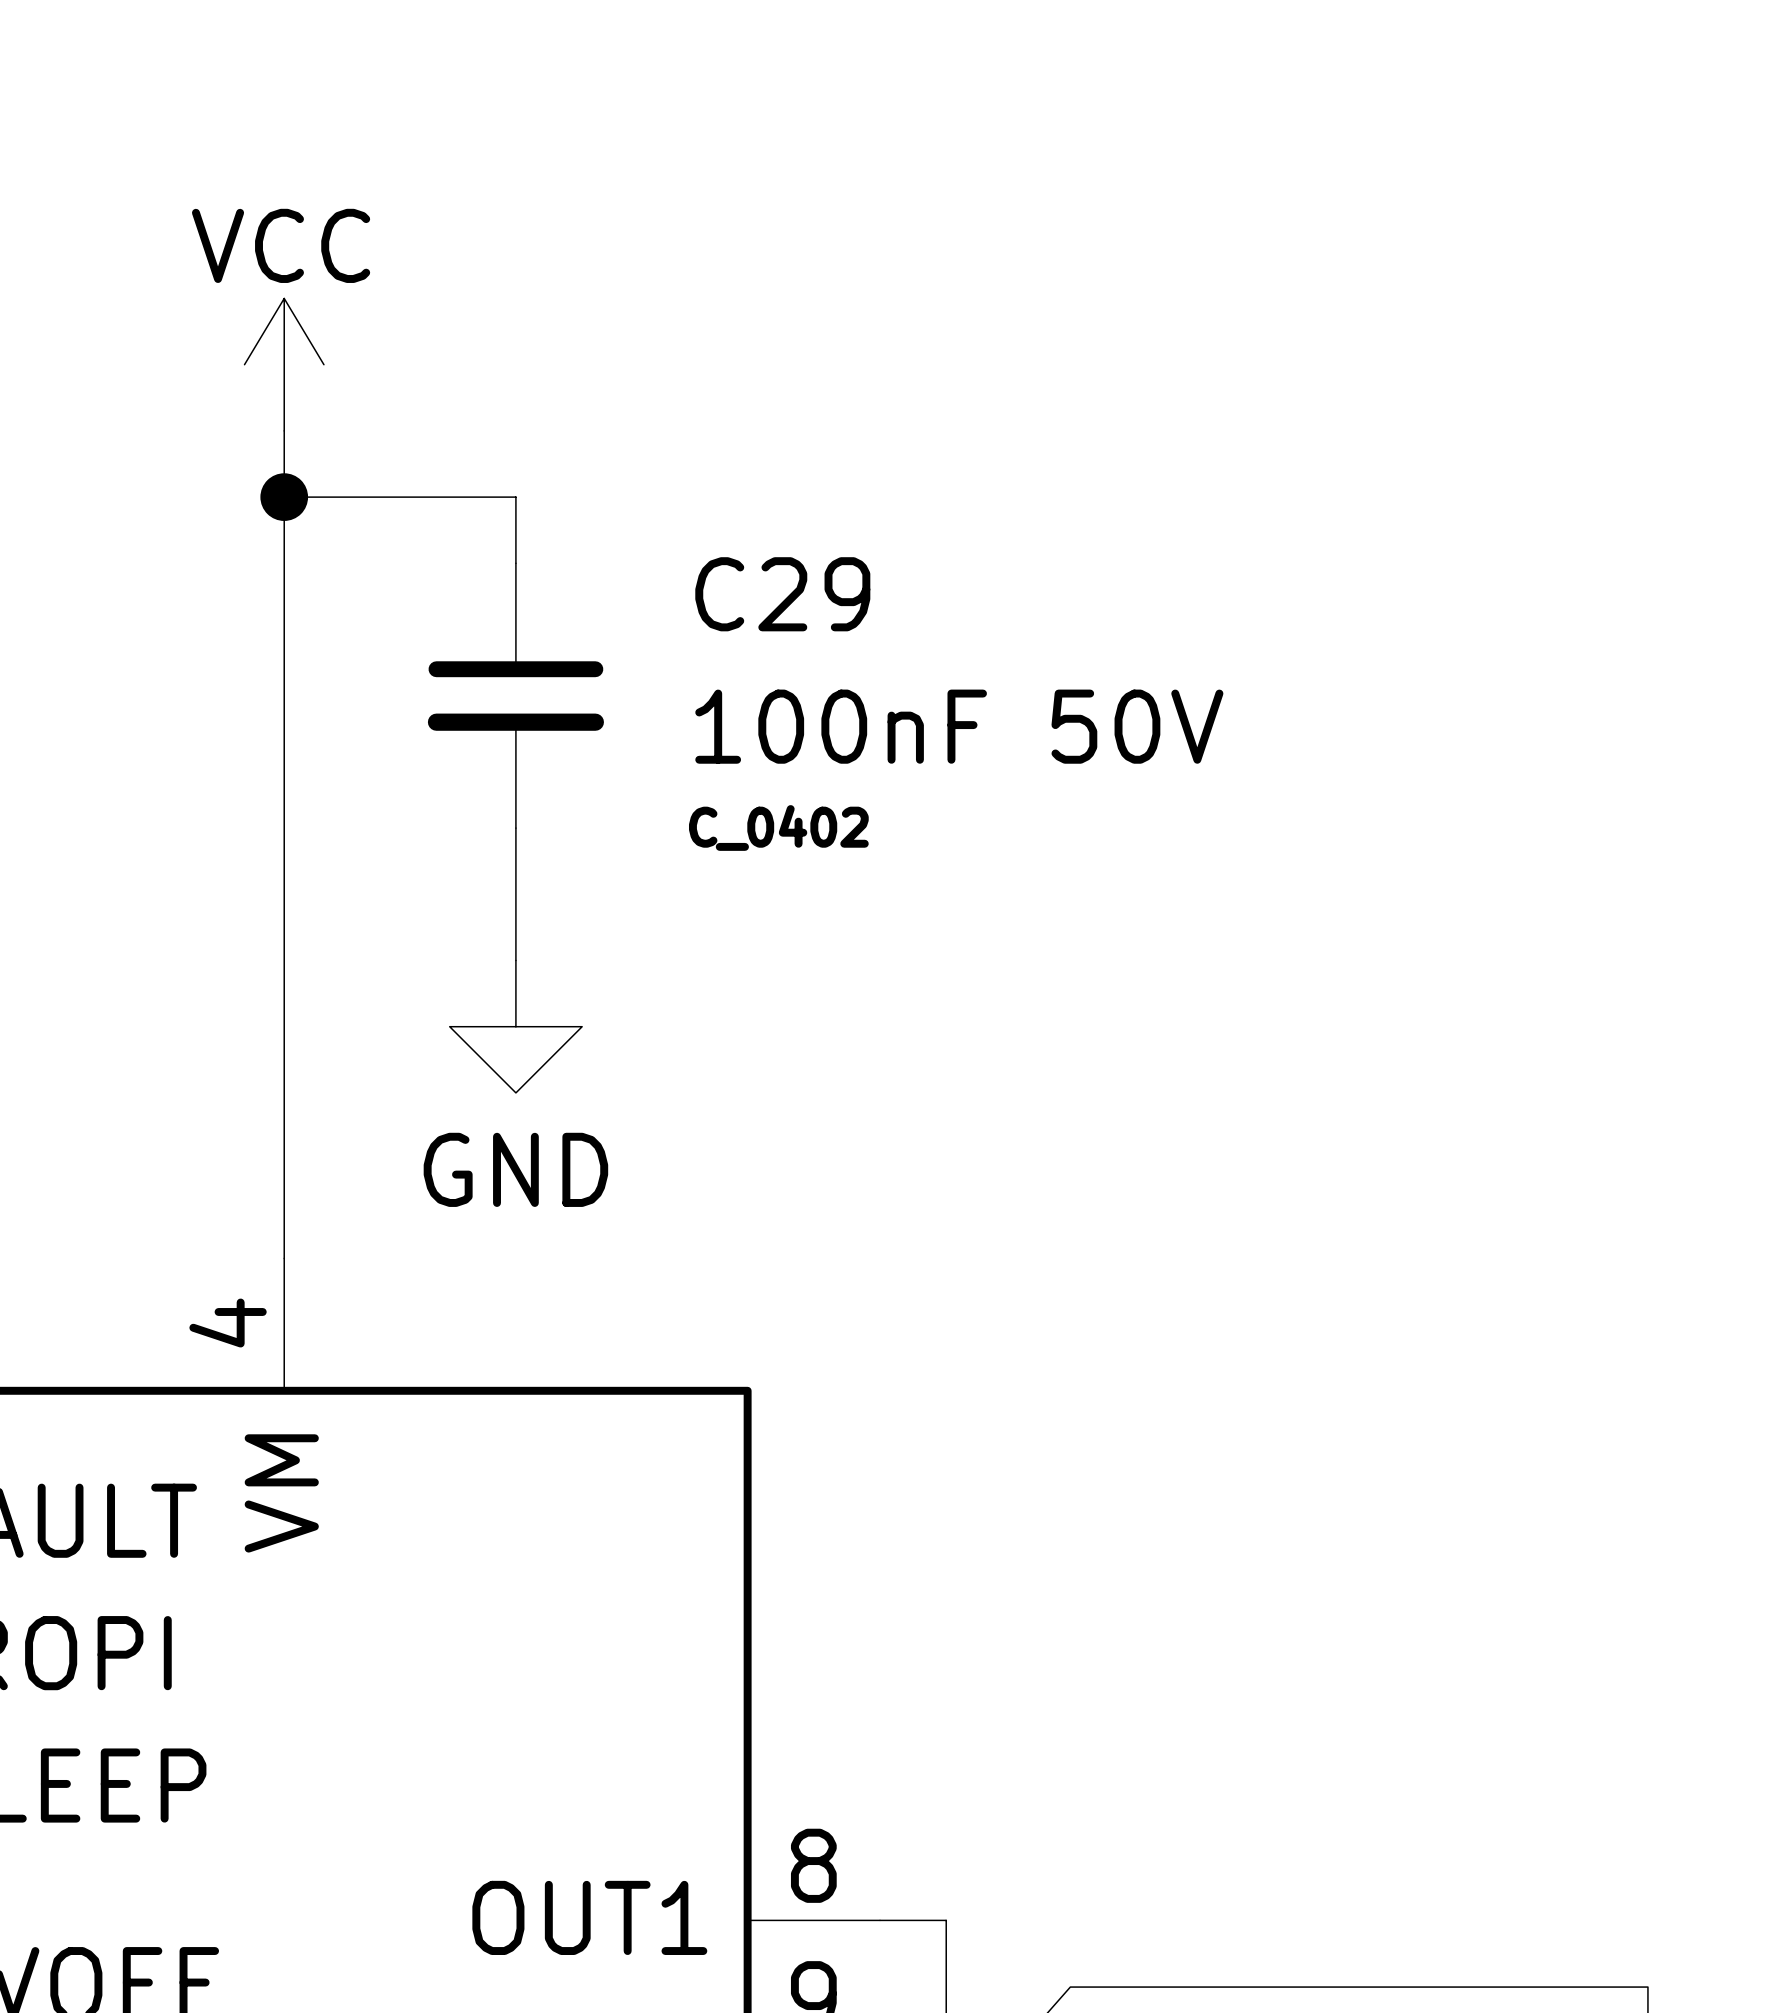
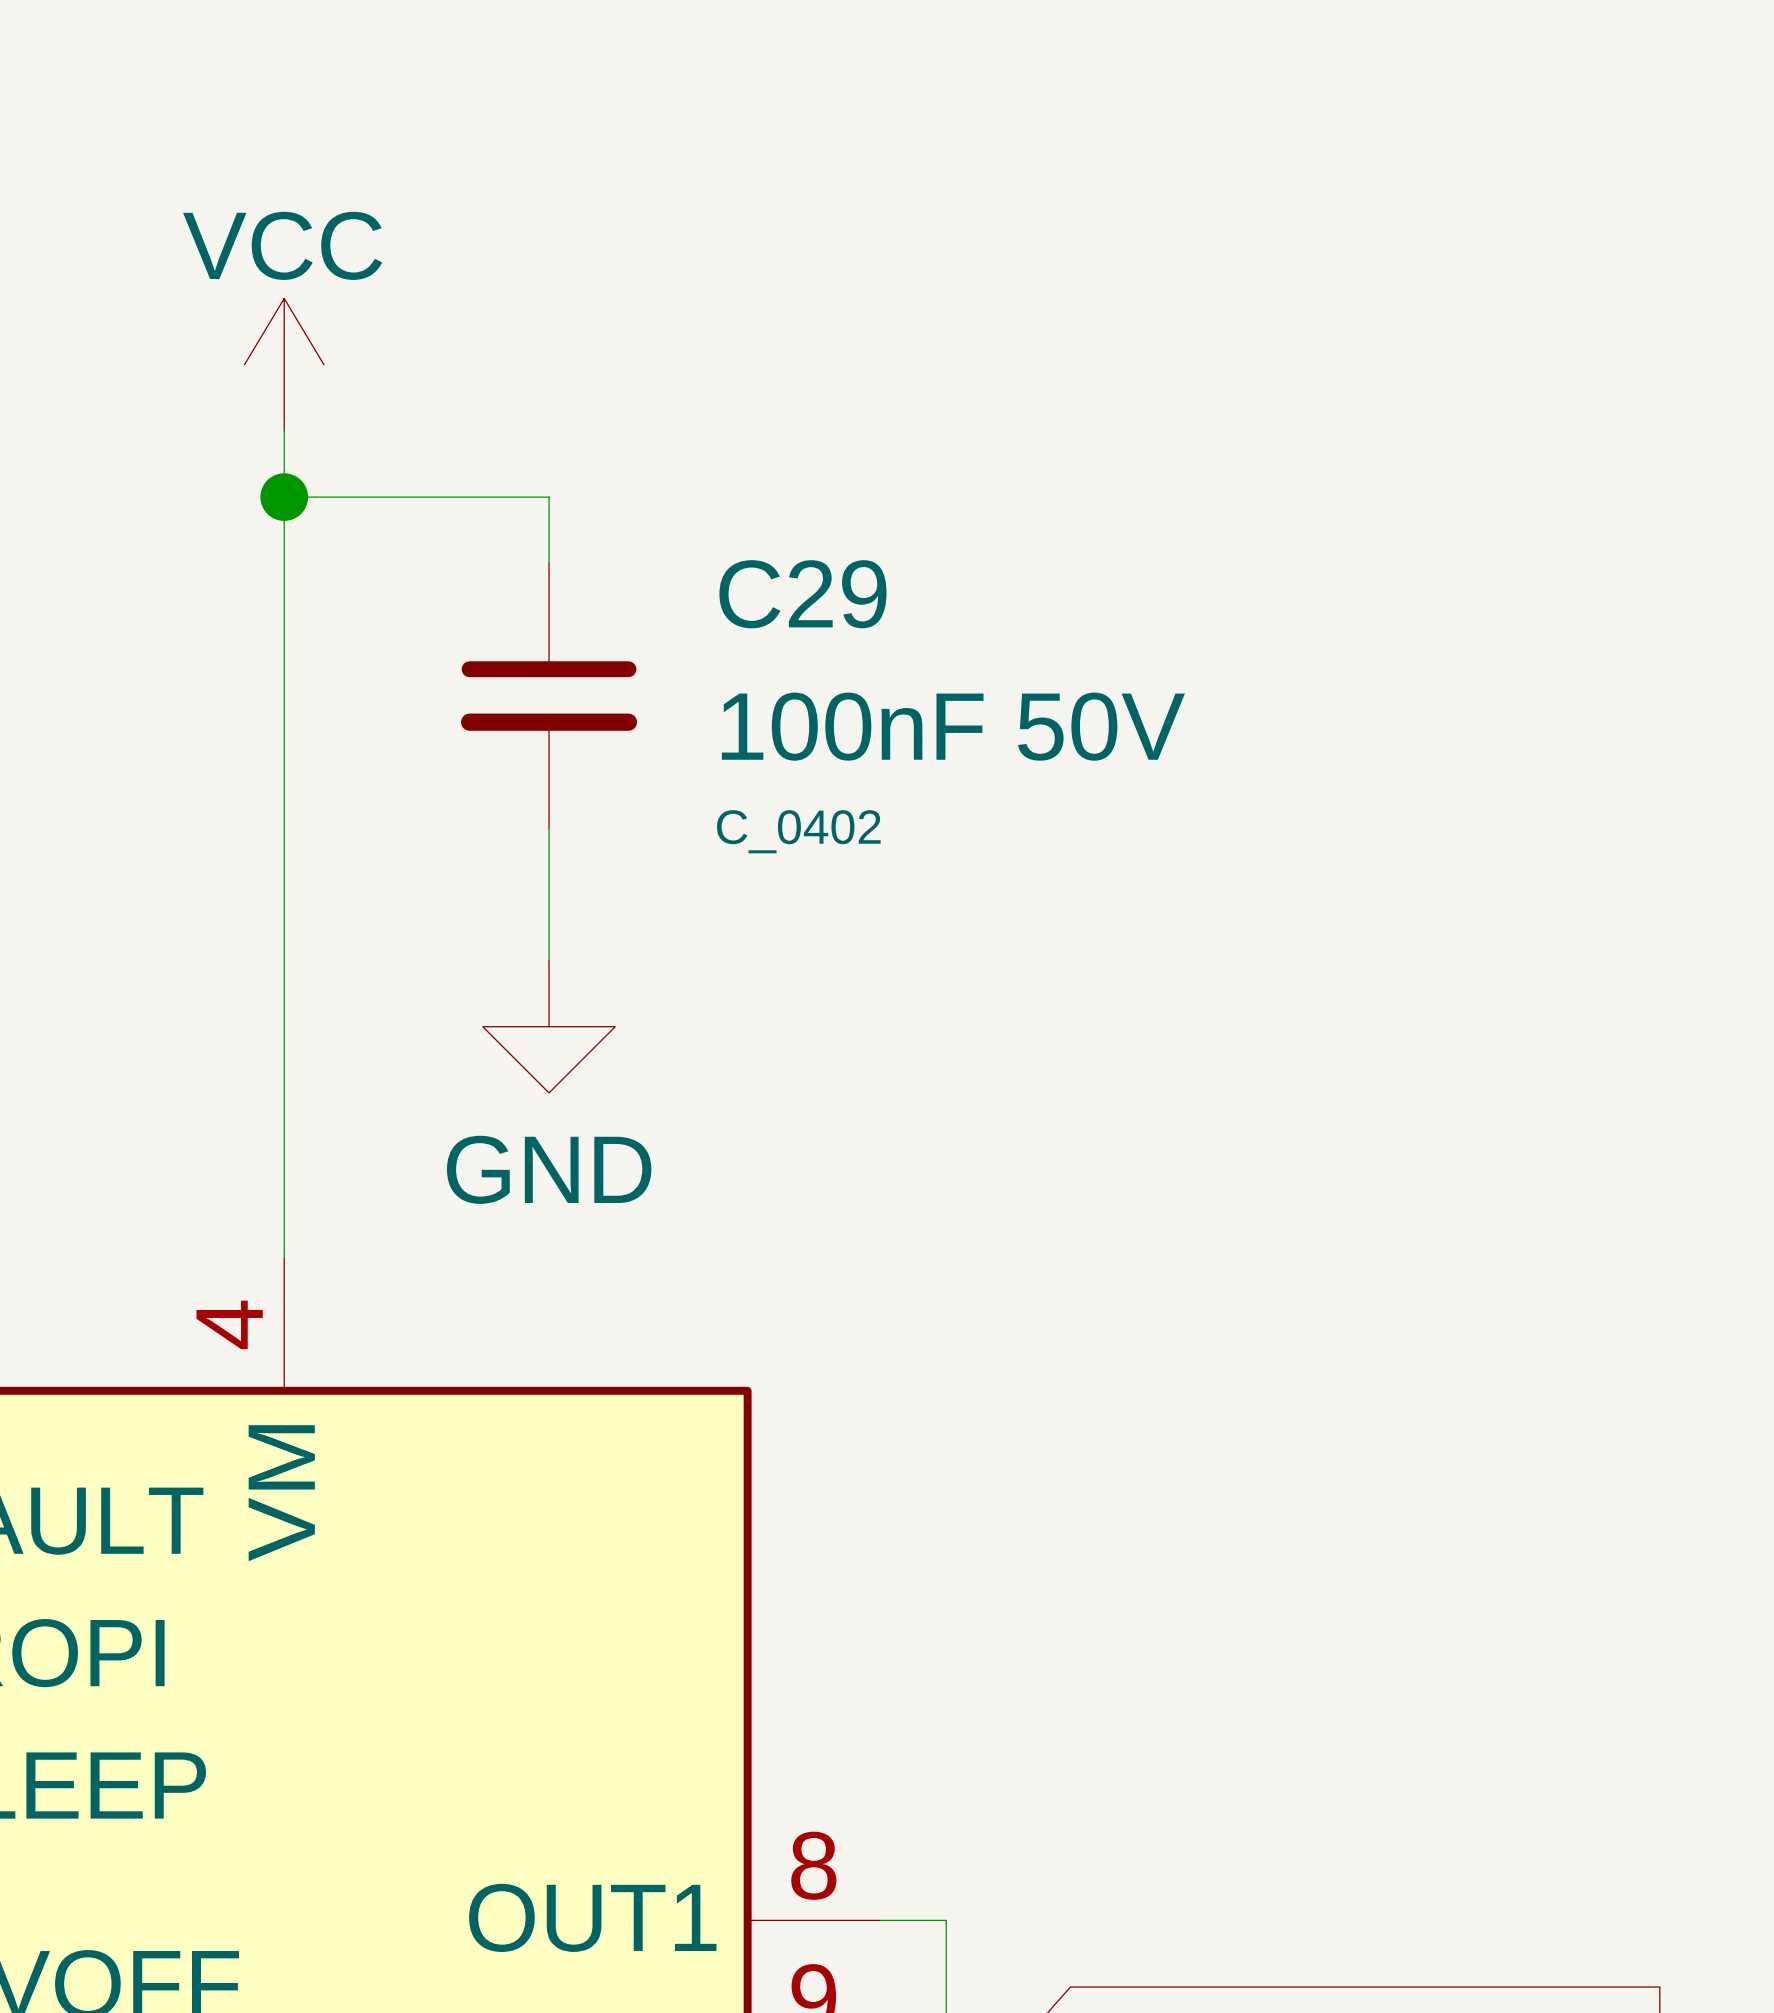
wire: (515, 497) (515, 563) -> (515, 497) (549, 497) (549, 563)
C29 position: (515, 695) -> (549, 695)
wire: (515, 828) (515, 960) -> (549, 828) (549, 960)
power symbol position: GND (515, 1026) -> GND (549, 1026)

